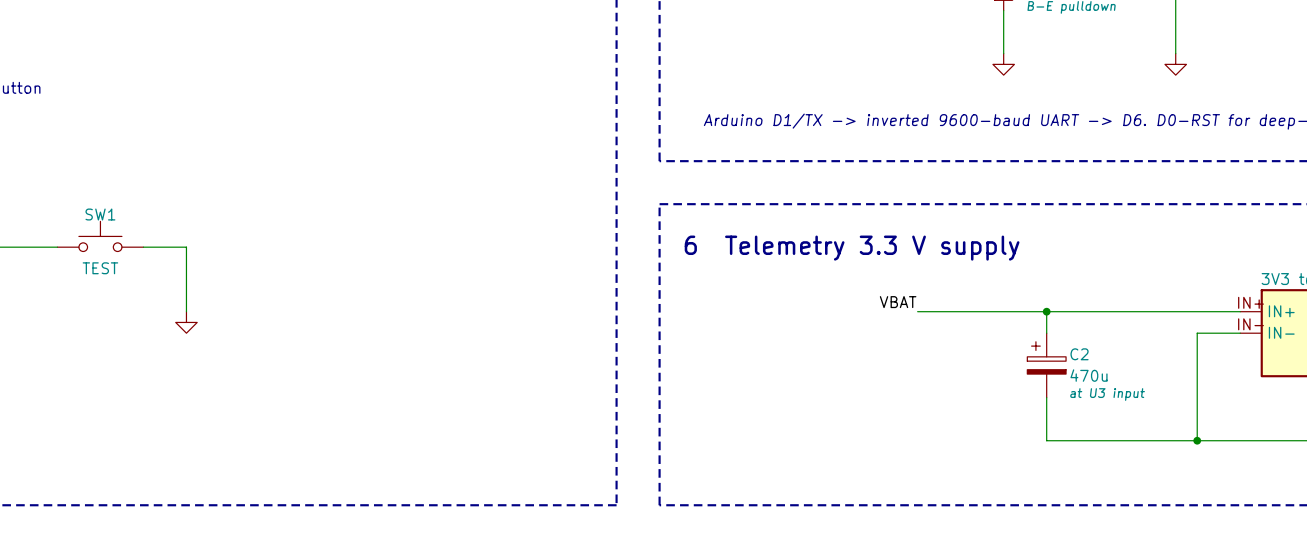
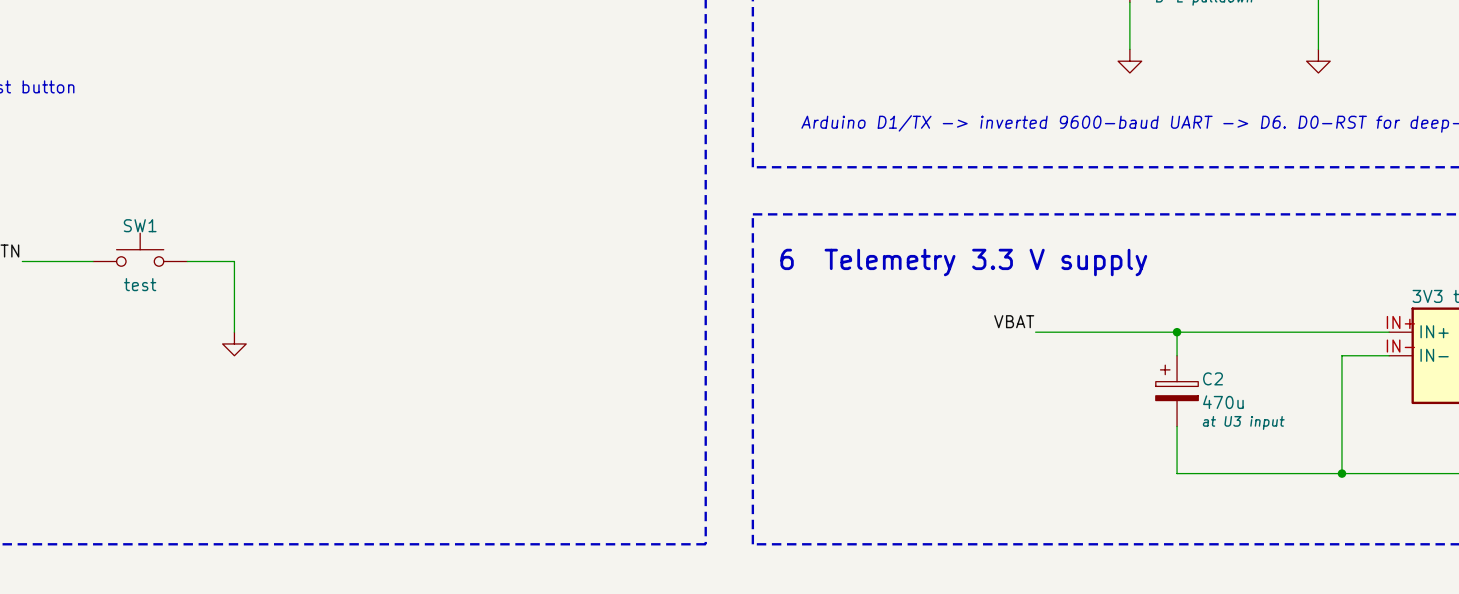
SW1 value: TEST (100, 268) -> test (140, 284)

